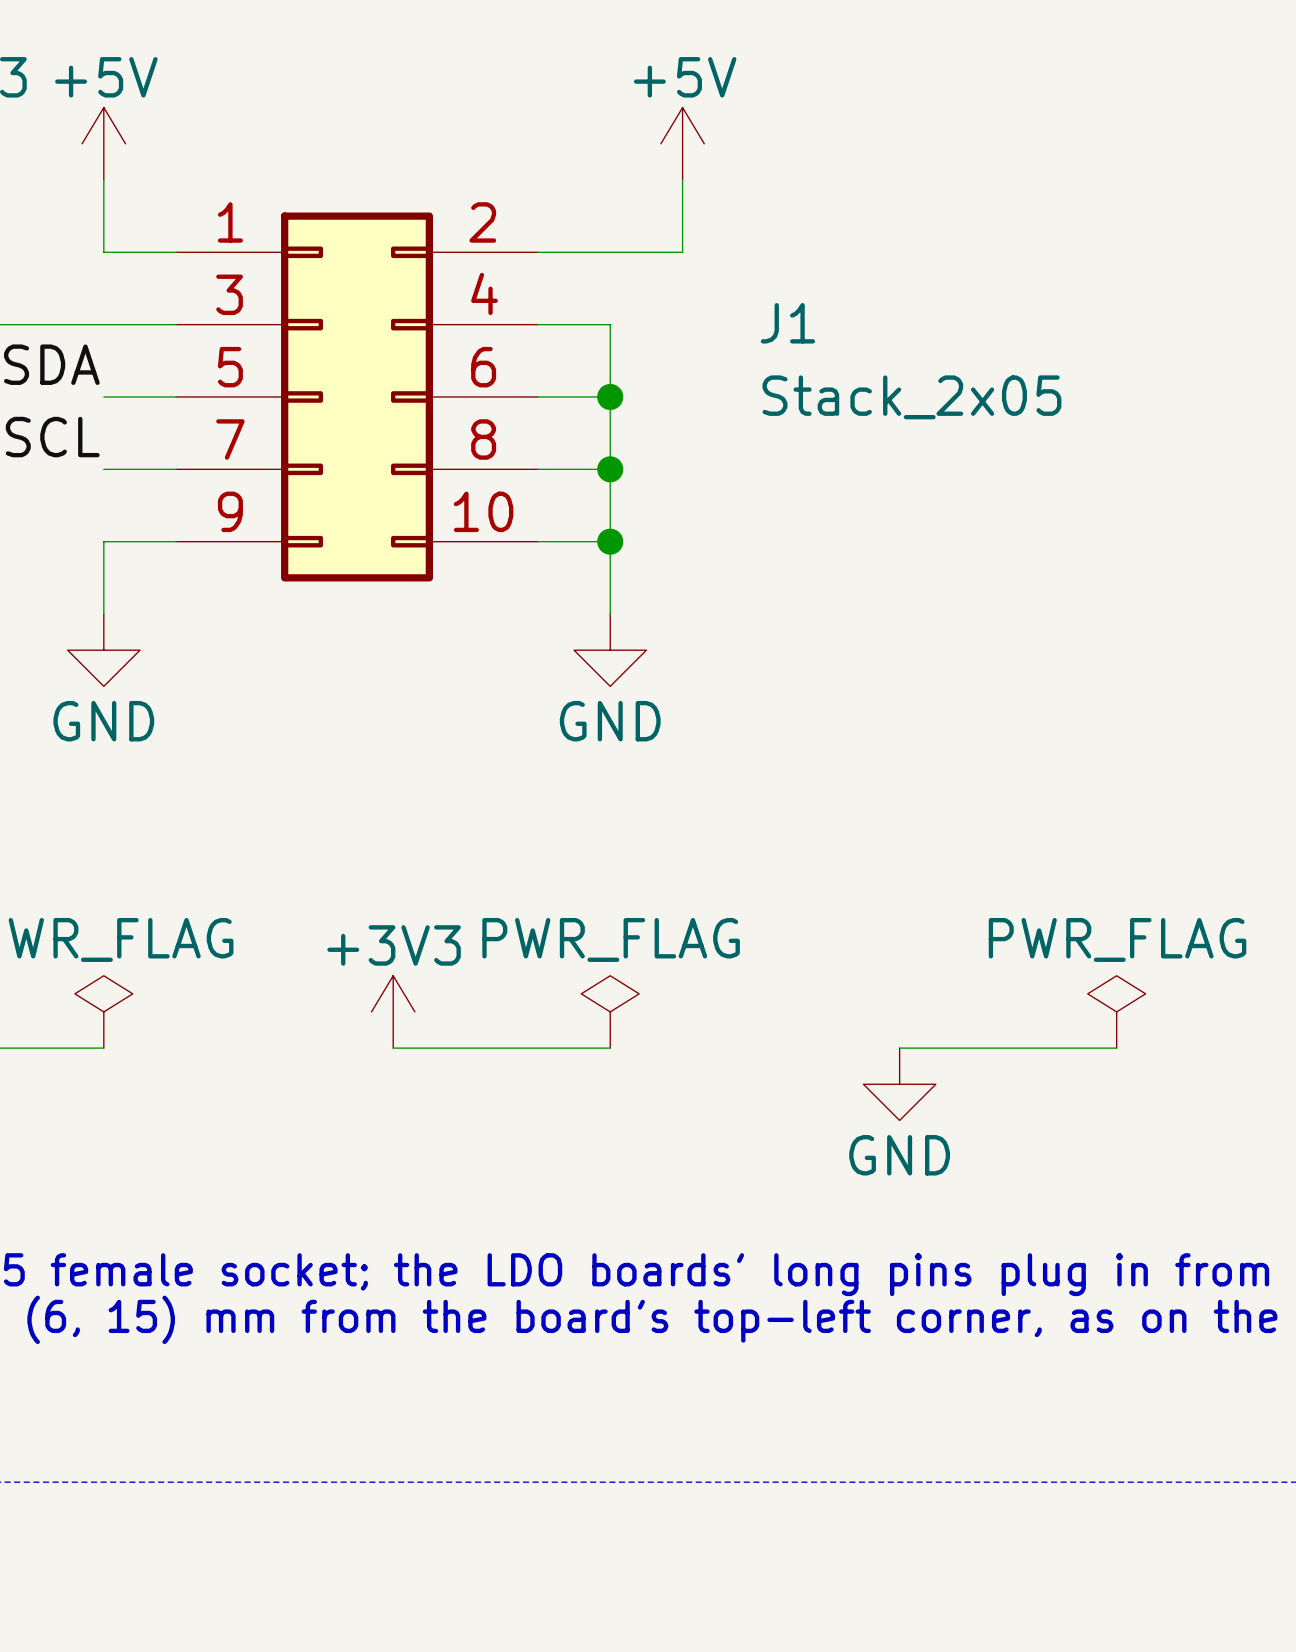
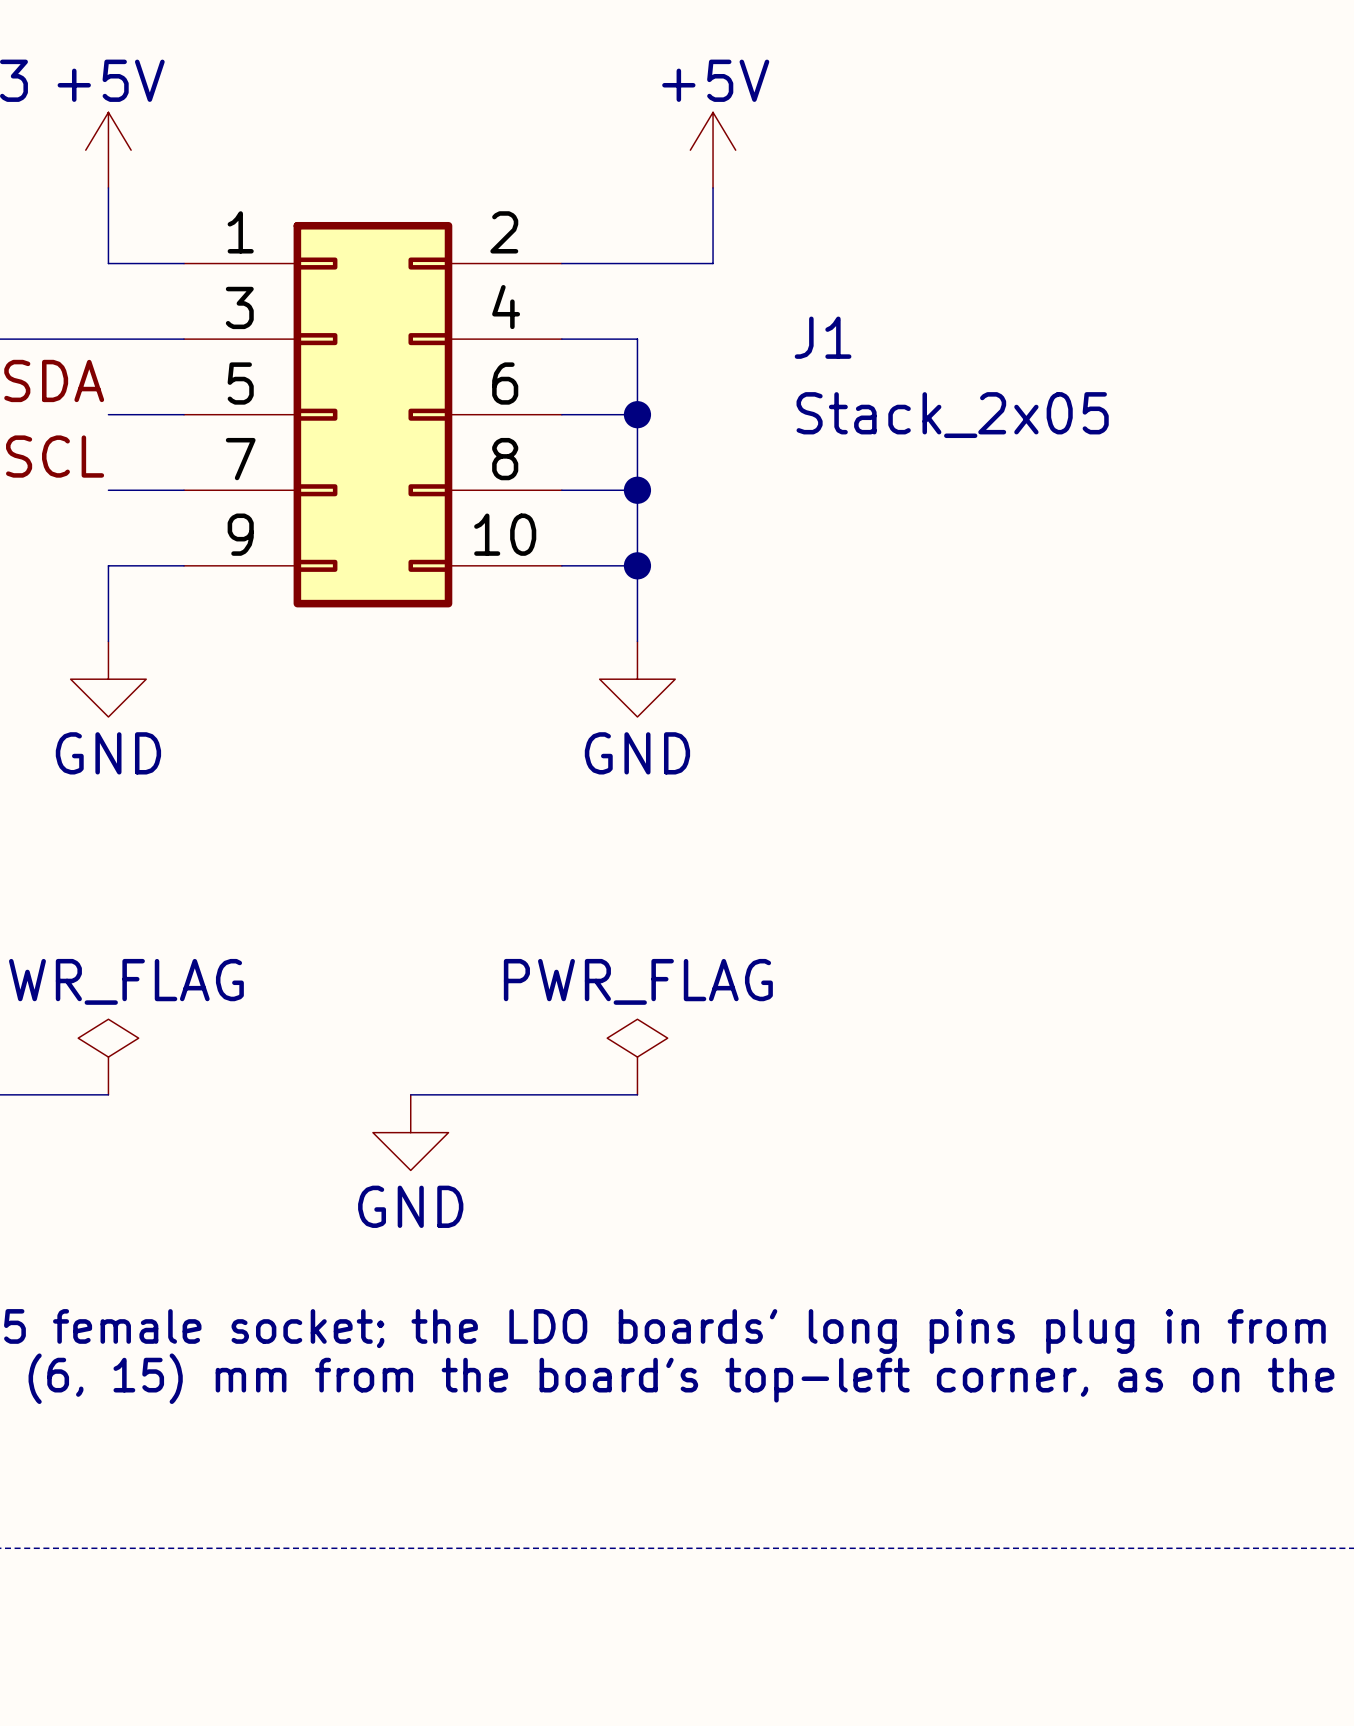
power symbol: +3V3 (393, 1011) -> none
power symbol: PWR_FLAG (1116, 1011) -> none
wire: (899, 1048) (1116, 1048) -> none
power symbol position: GND (899, 1084) -> GND (410, 1132)

